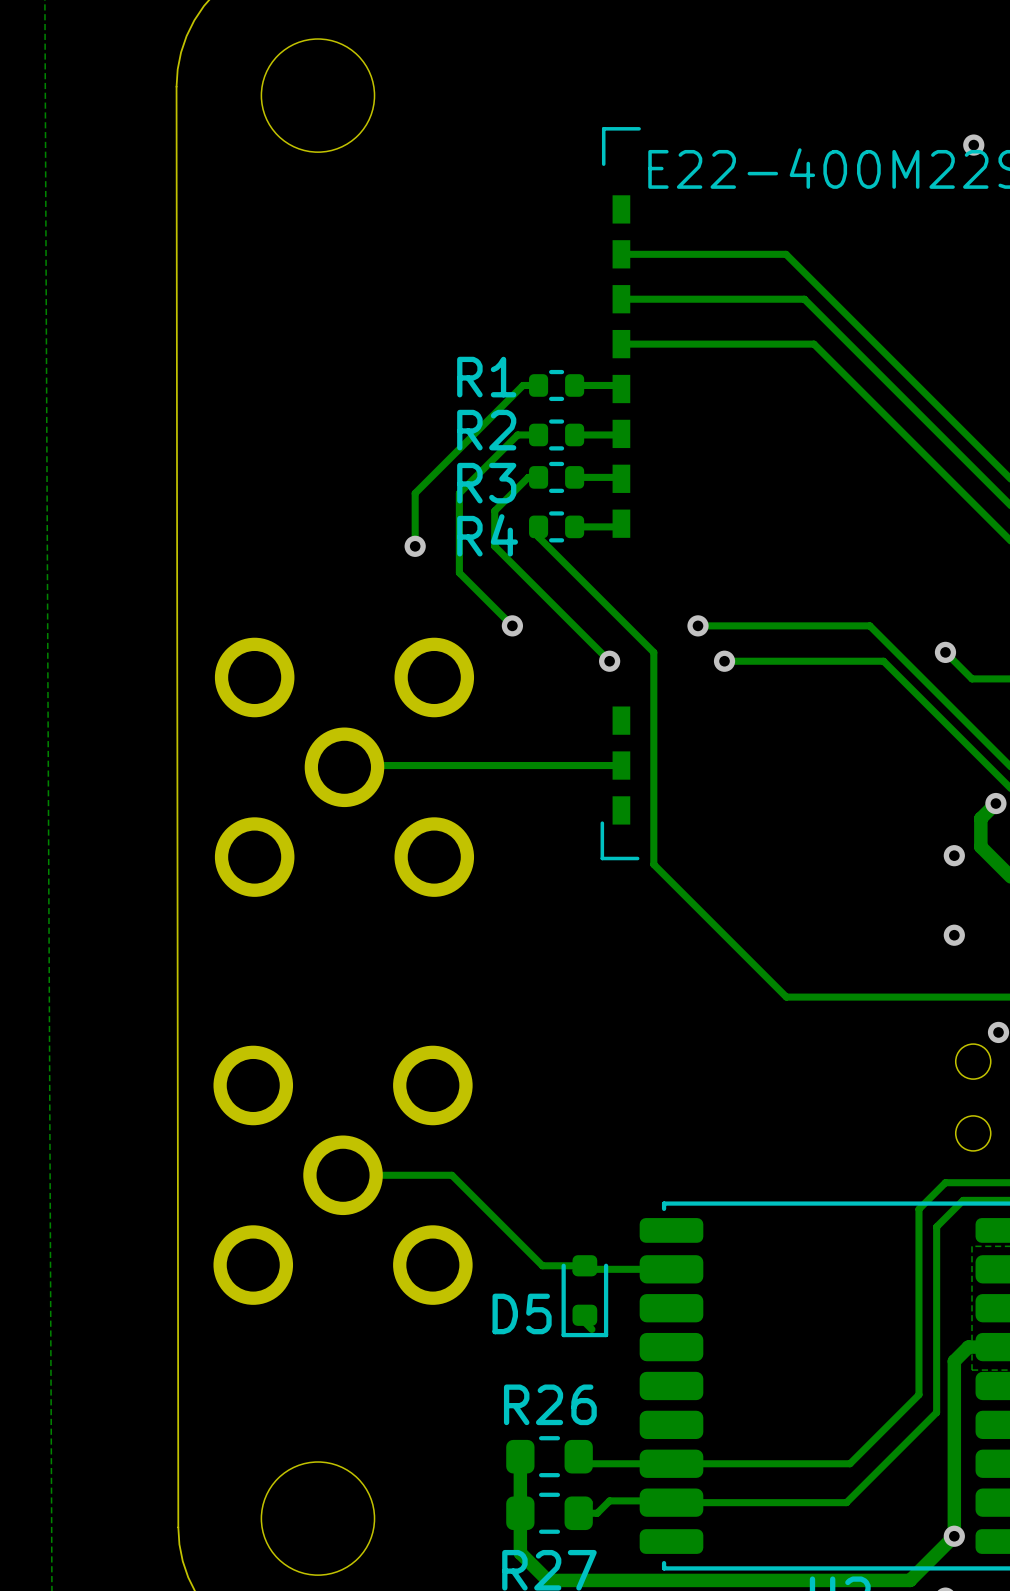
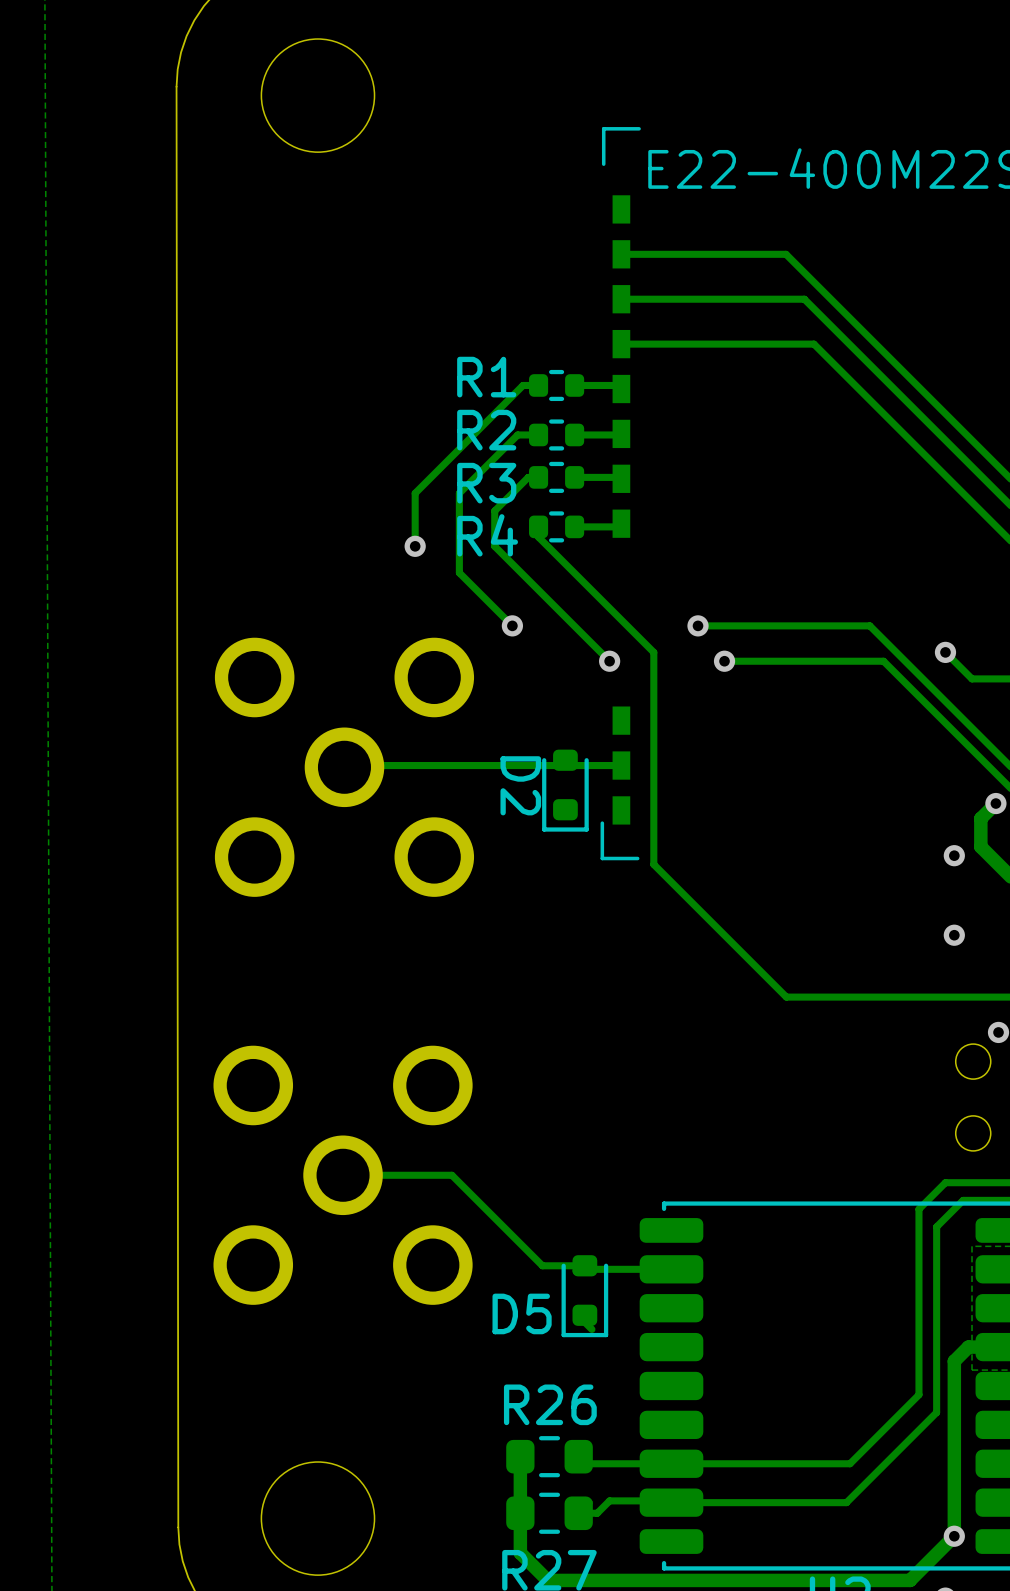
via: (973, 145) -> none
D2: none -> (565, 790)

